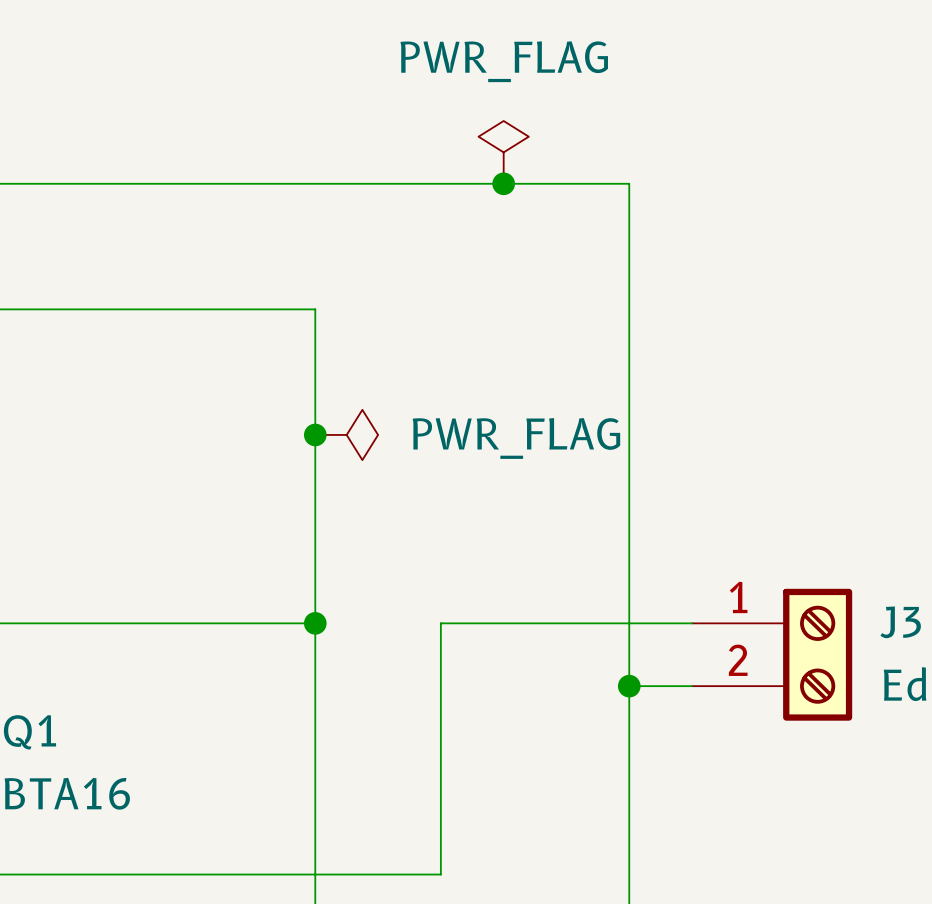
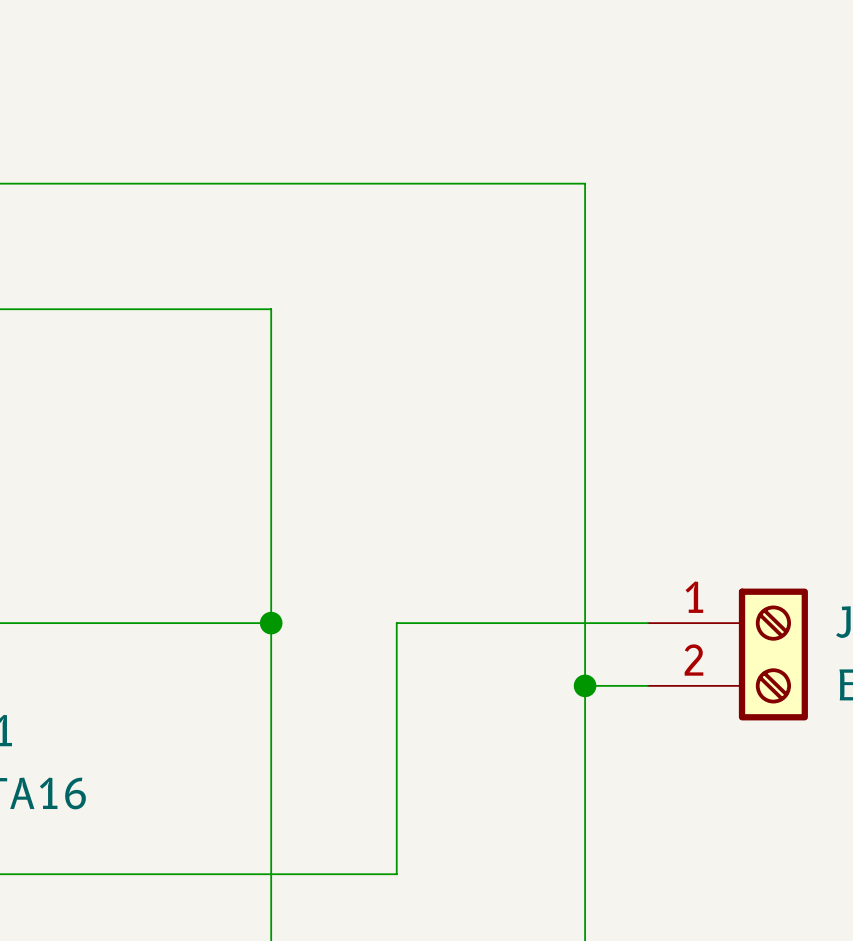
power symbol: PWR_FLAG (503, 152) -> none
junction: (503, 183) -> none
junction: (315, 434) -> none
power symbol: PWR_FLAG (346, 434) -> none

